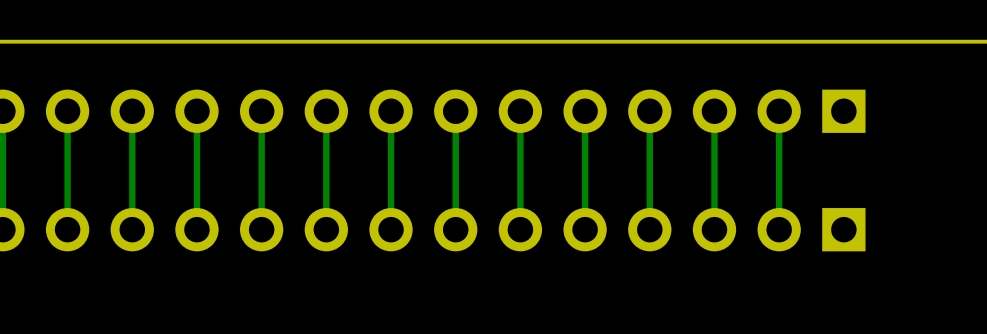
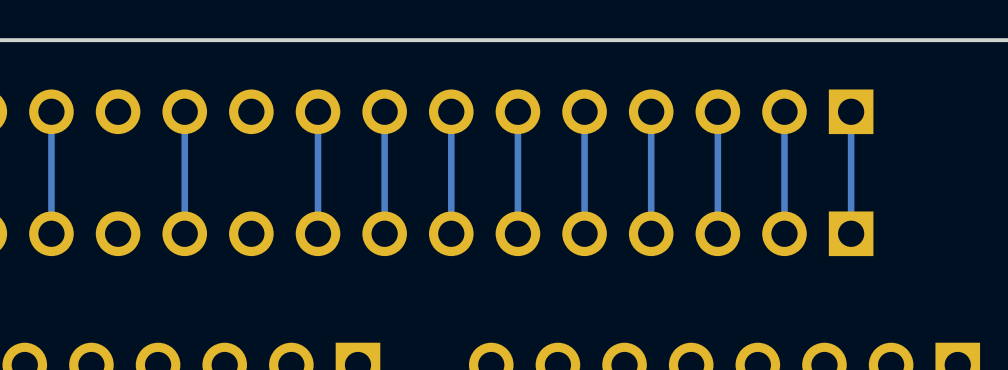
track: (132, 111) (132, 229) -> none
track: (261, 111) (261, 229) -> (851, 111) (851, 233)

